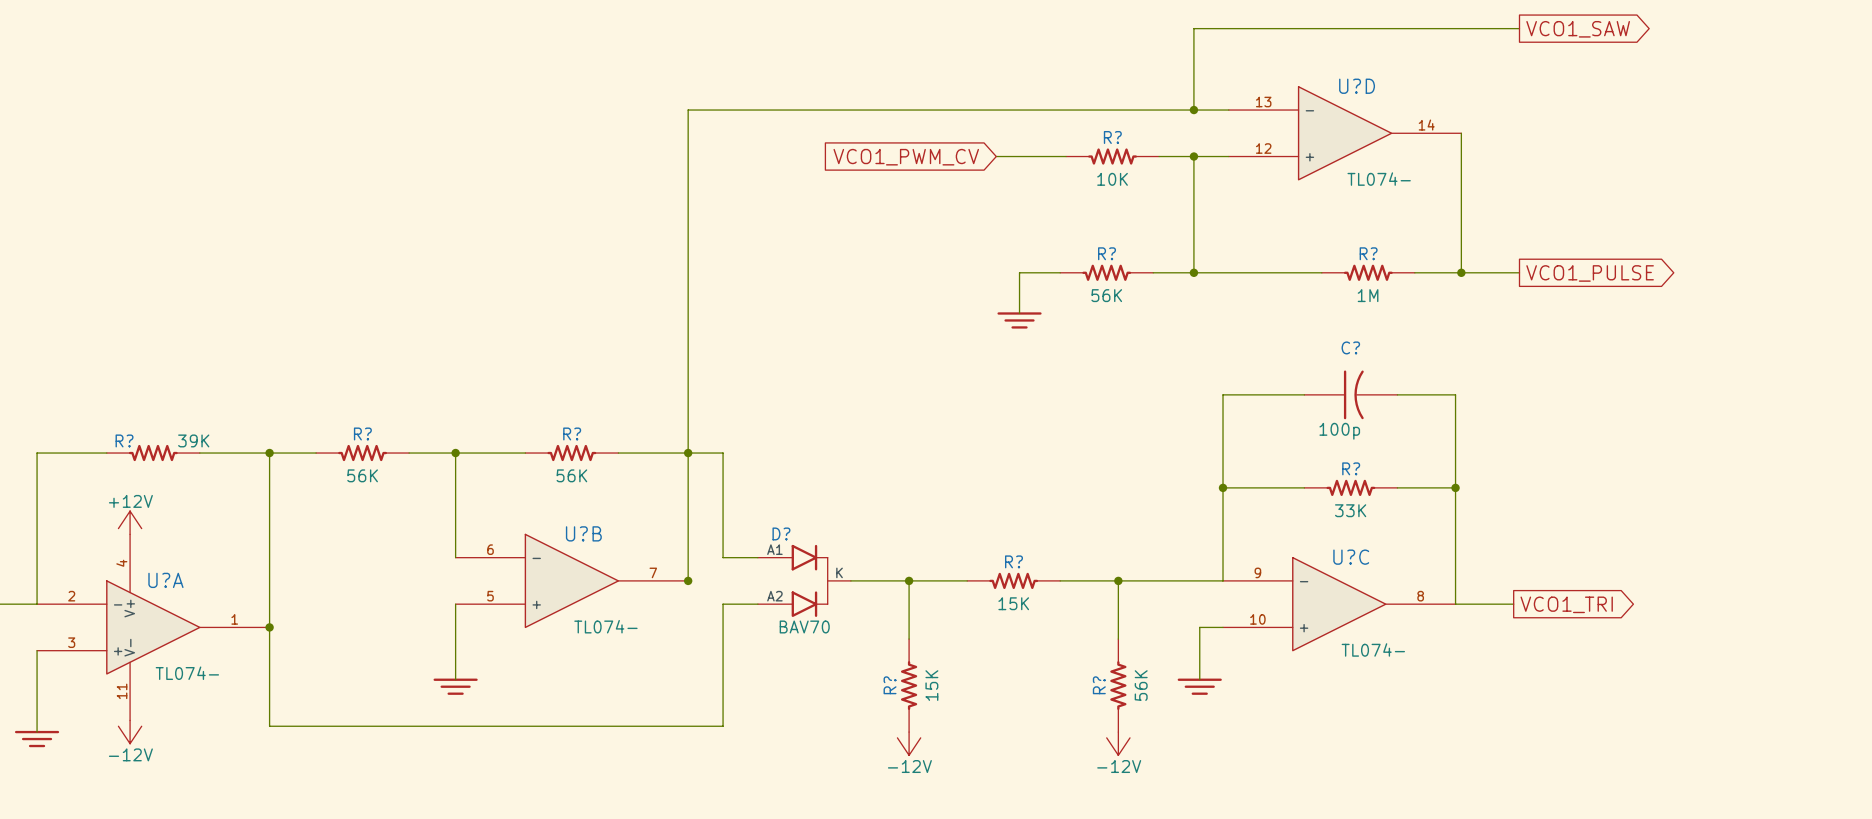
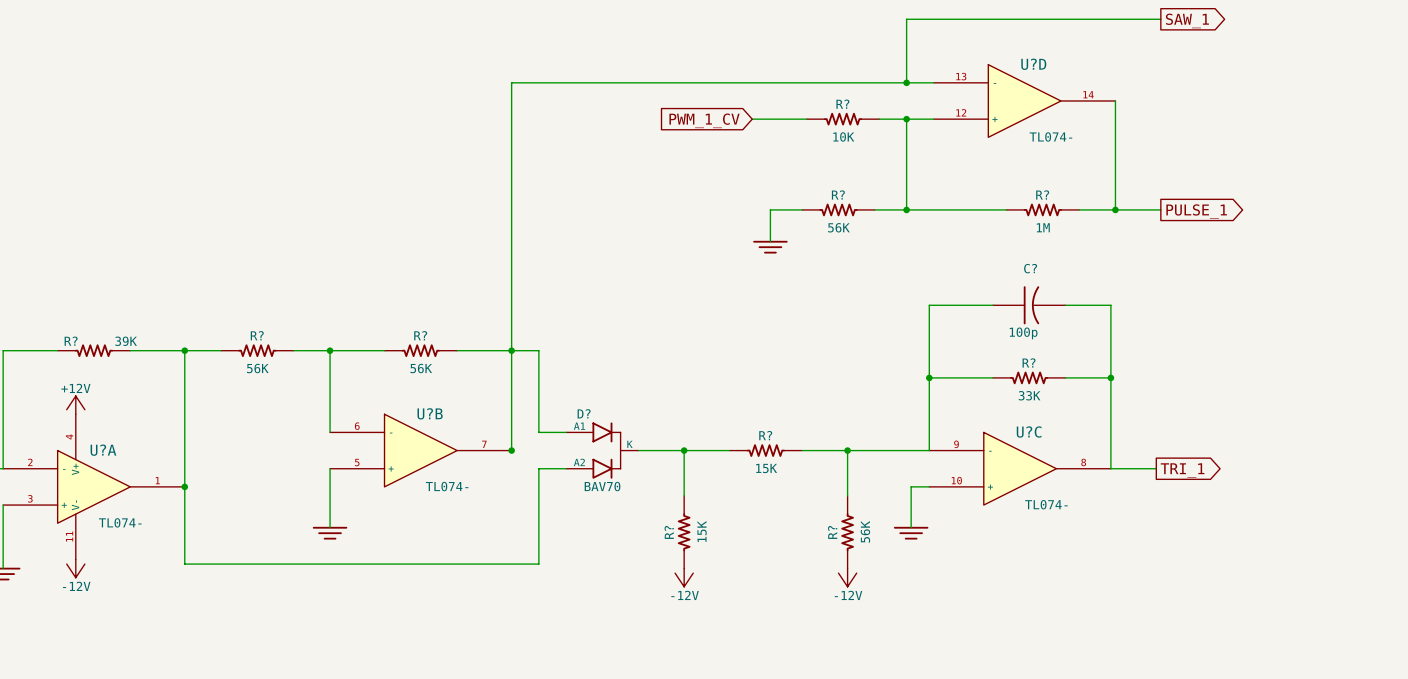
global label: VCO1_SAW (1578, 29) -> SAW_1 (1187, 20)
global label: VCO1_PWM_CV (906, 157) -> PWM_1_CV (704, 120)
global label: VCO1_PULSE (1590, 273) -> PULSE_1 (1196, 211)
global label: VCO1_TRI (1566, 604) -> TRI_1 (1182, 470)

